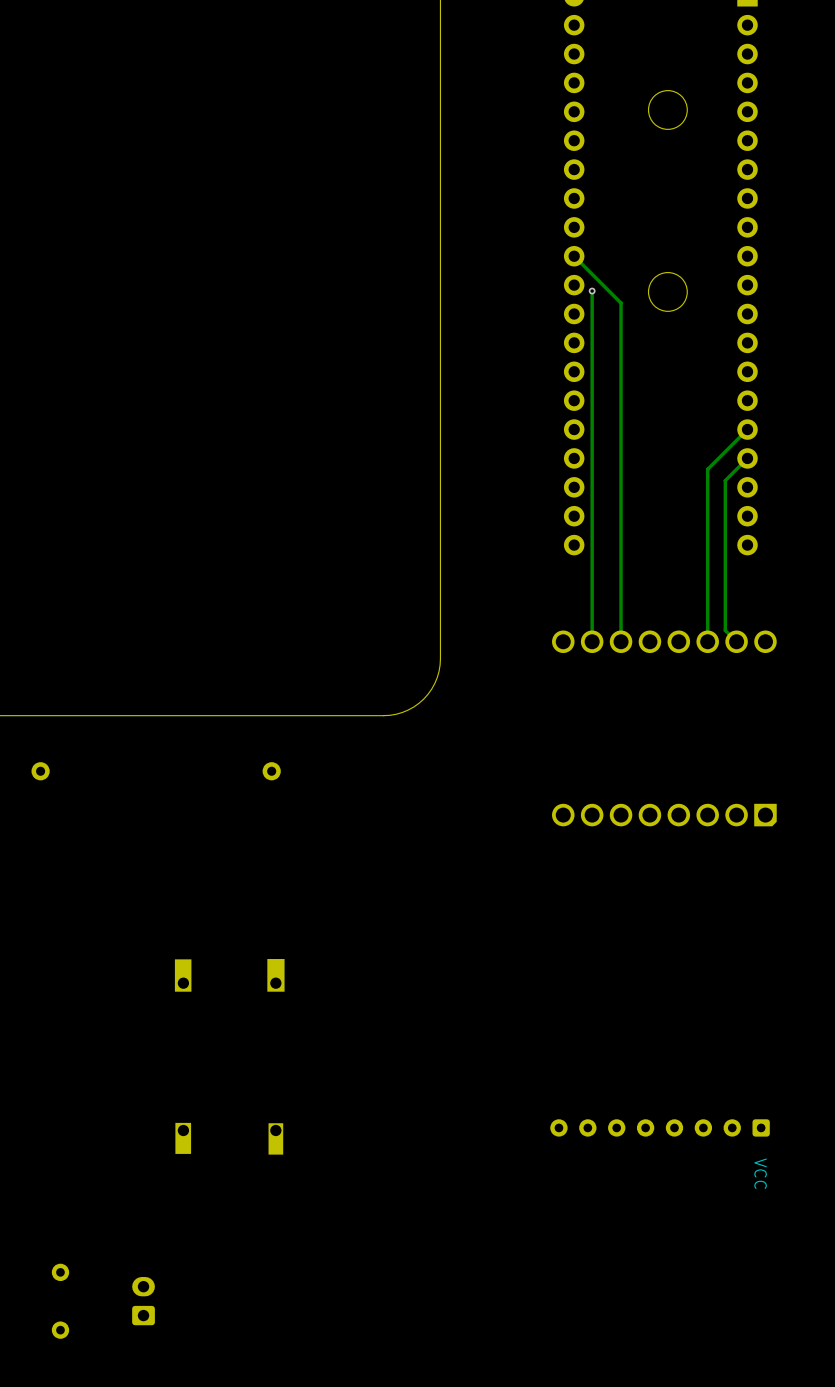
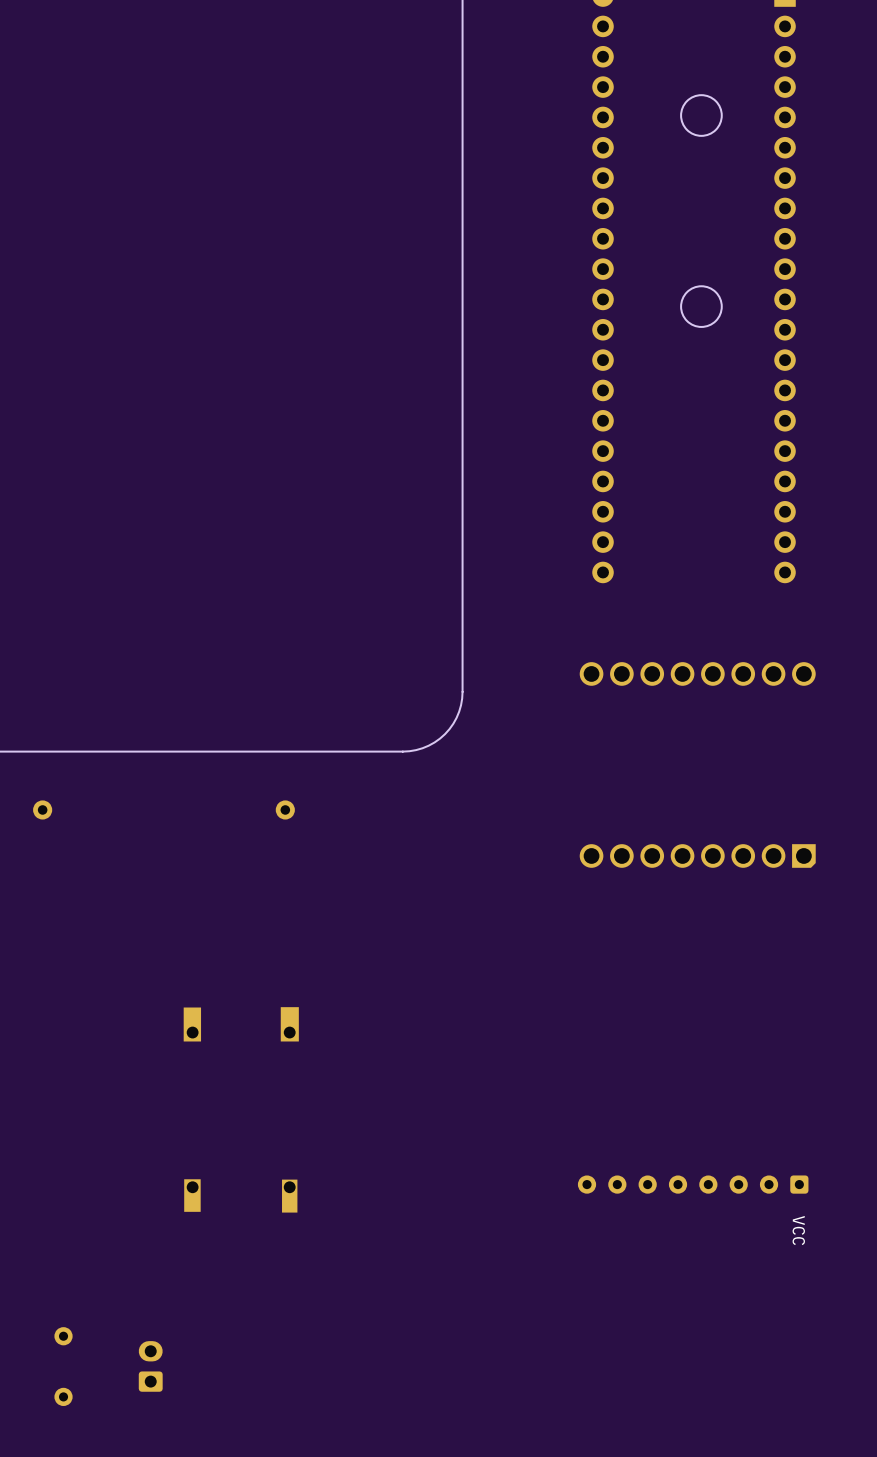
track: (574, 256) (621, 303) (621, 641) -> none
track: (592, 291) (592, 641) -> none
via: (592, 291) -> none
track: (747, 429) (707, 469) (707, 641) -> none
track: (747, 458) (725, 480) (725, 630) (736, 641) -> none

